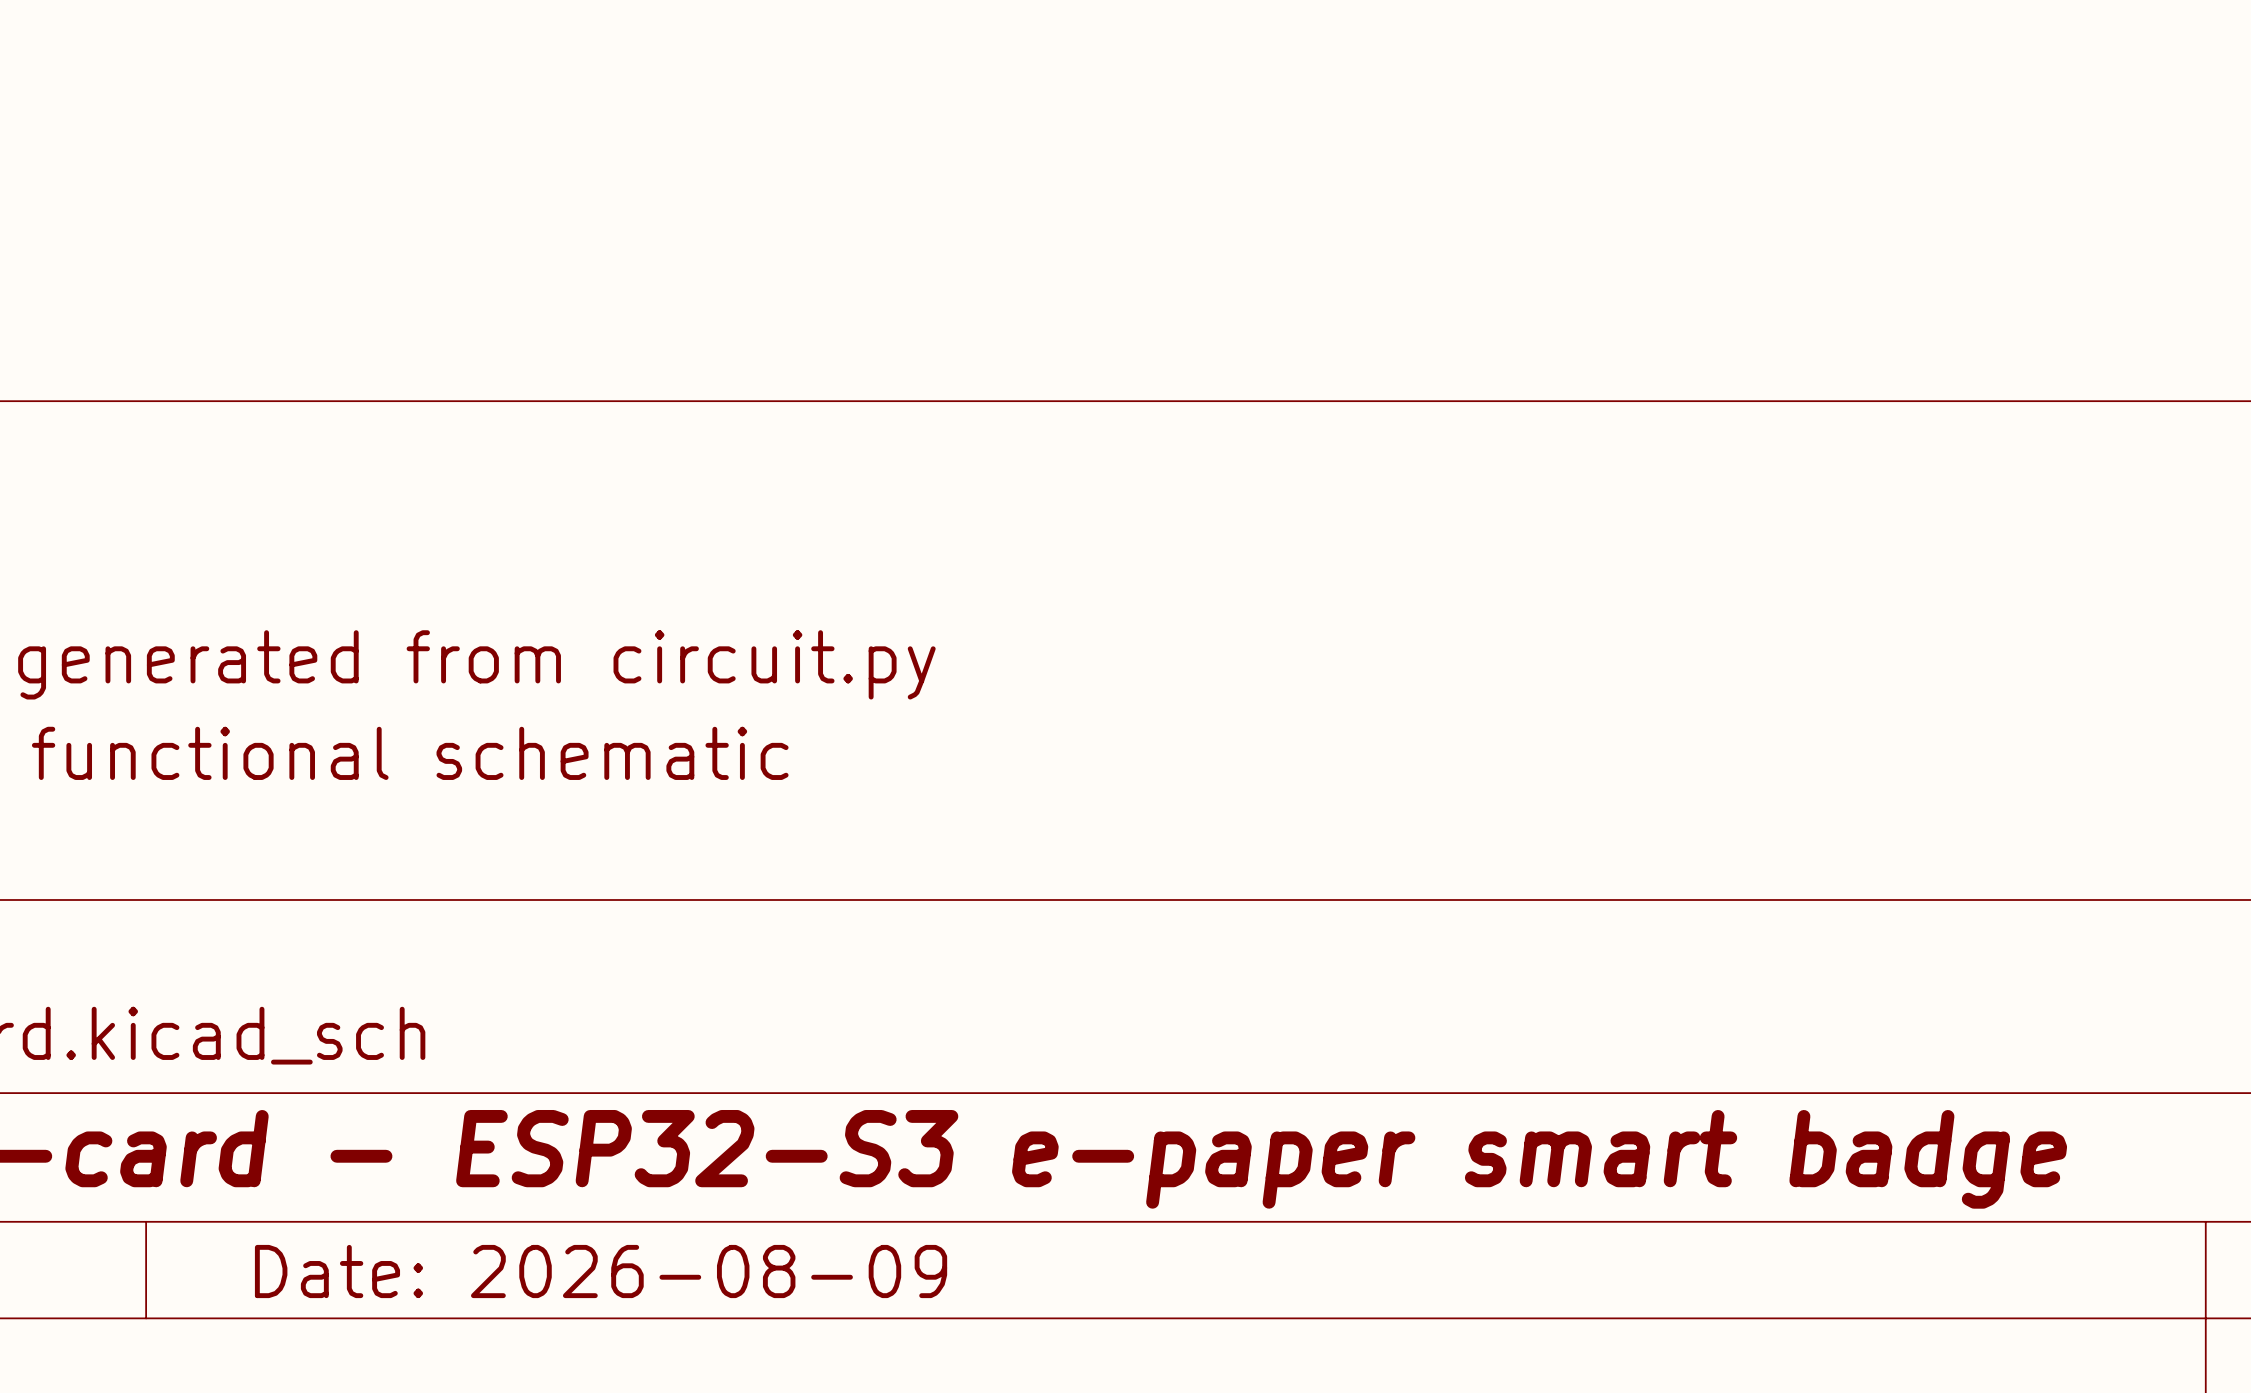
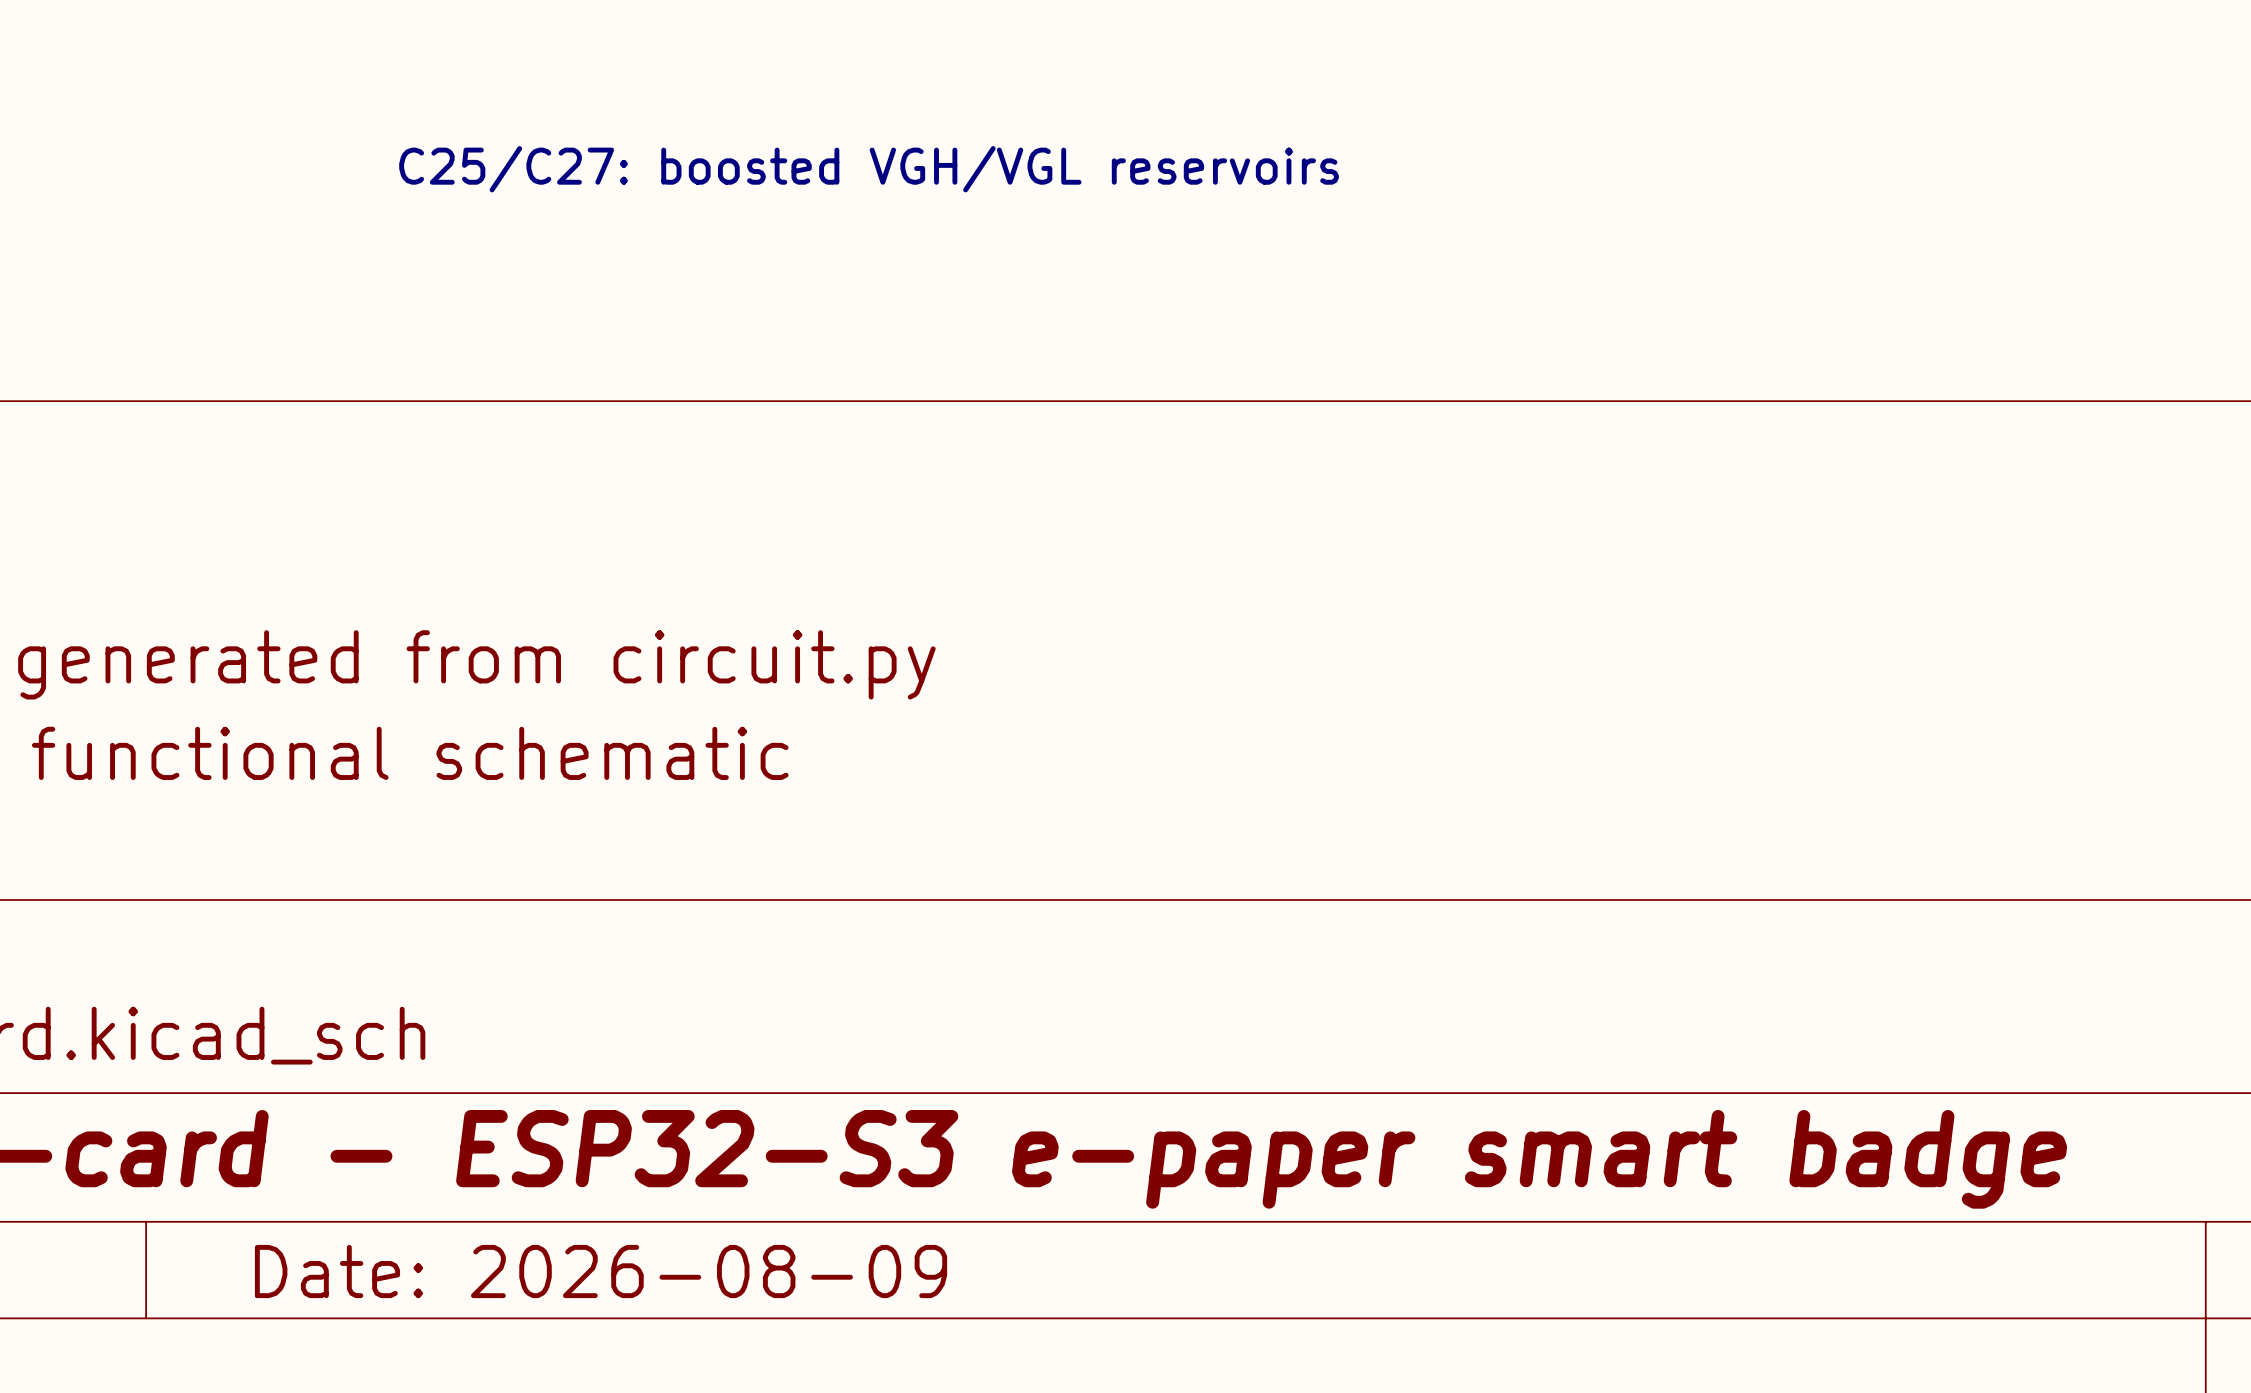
text: none -> C25/C27: boosted VGH/VGL reservoirs (869, 169)

